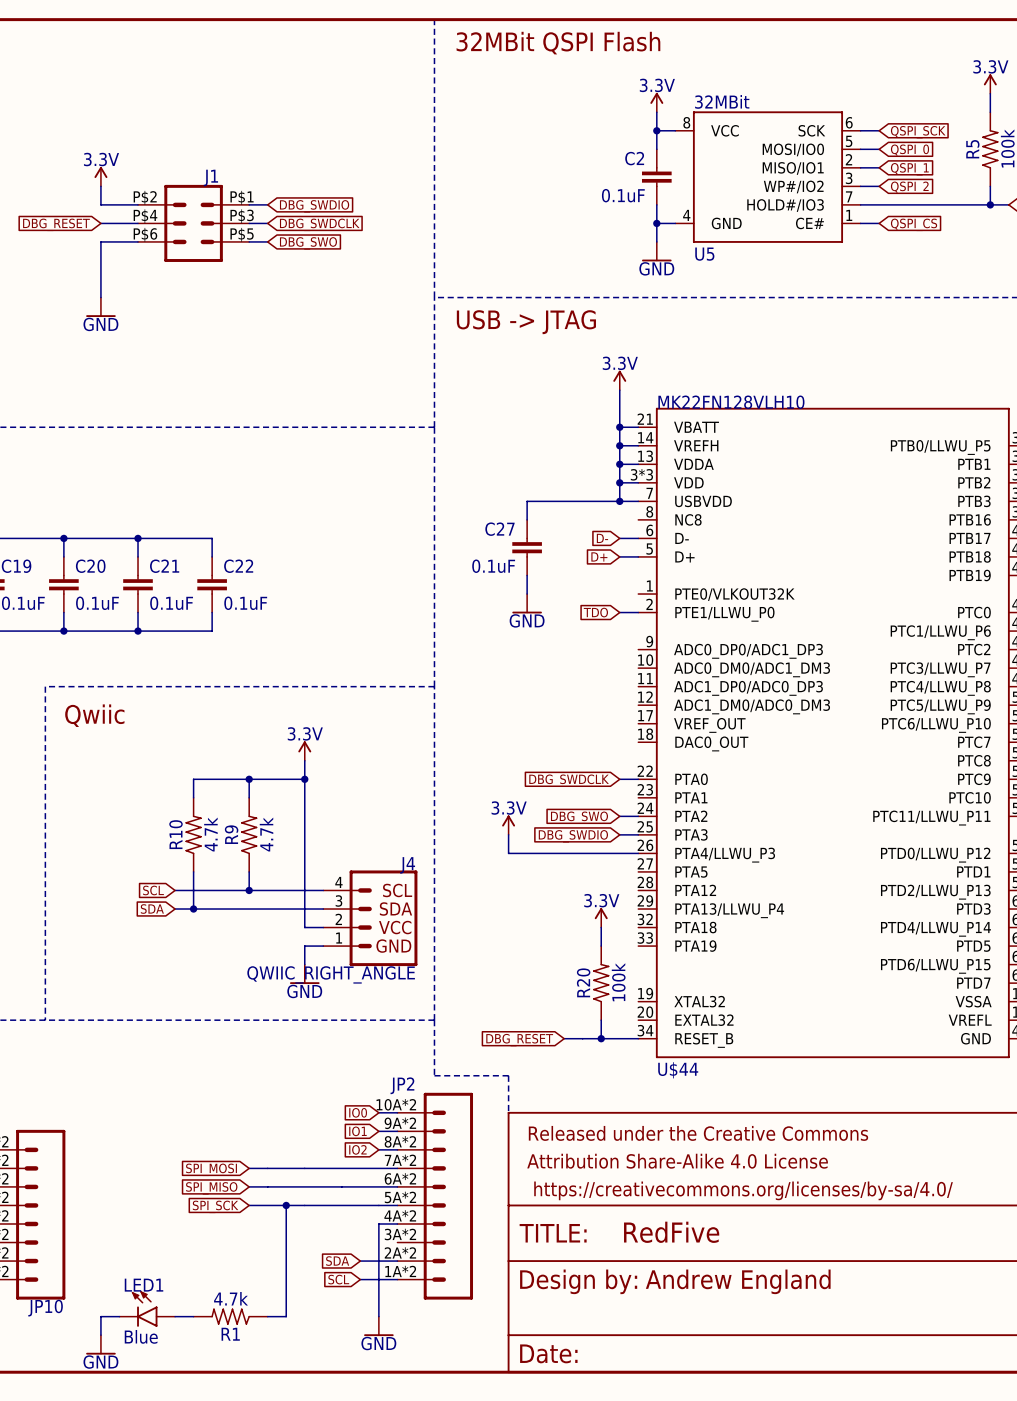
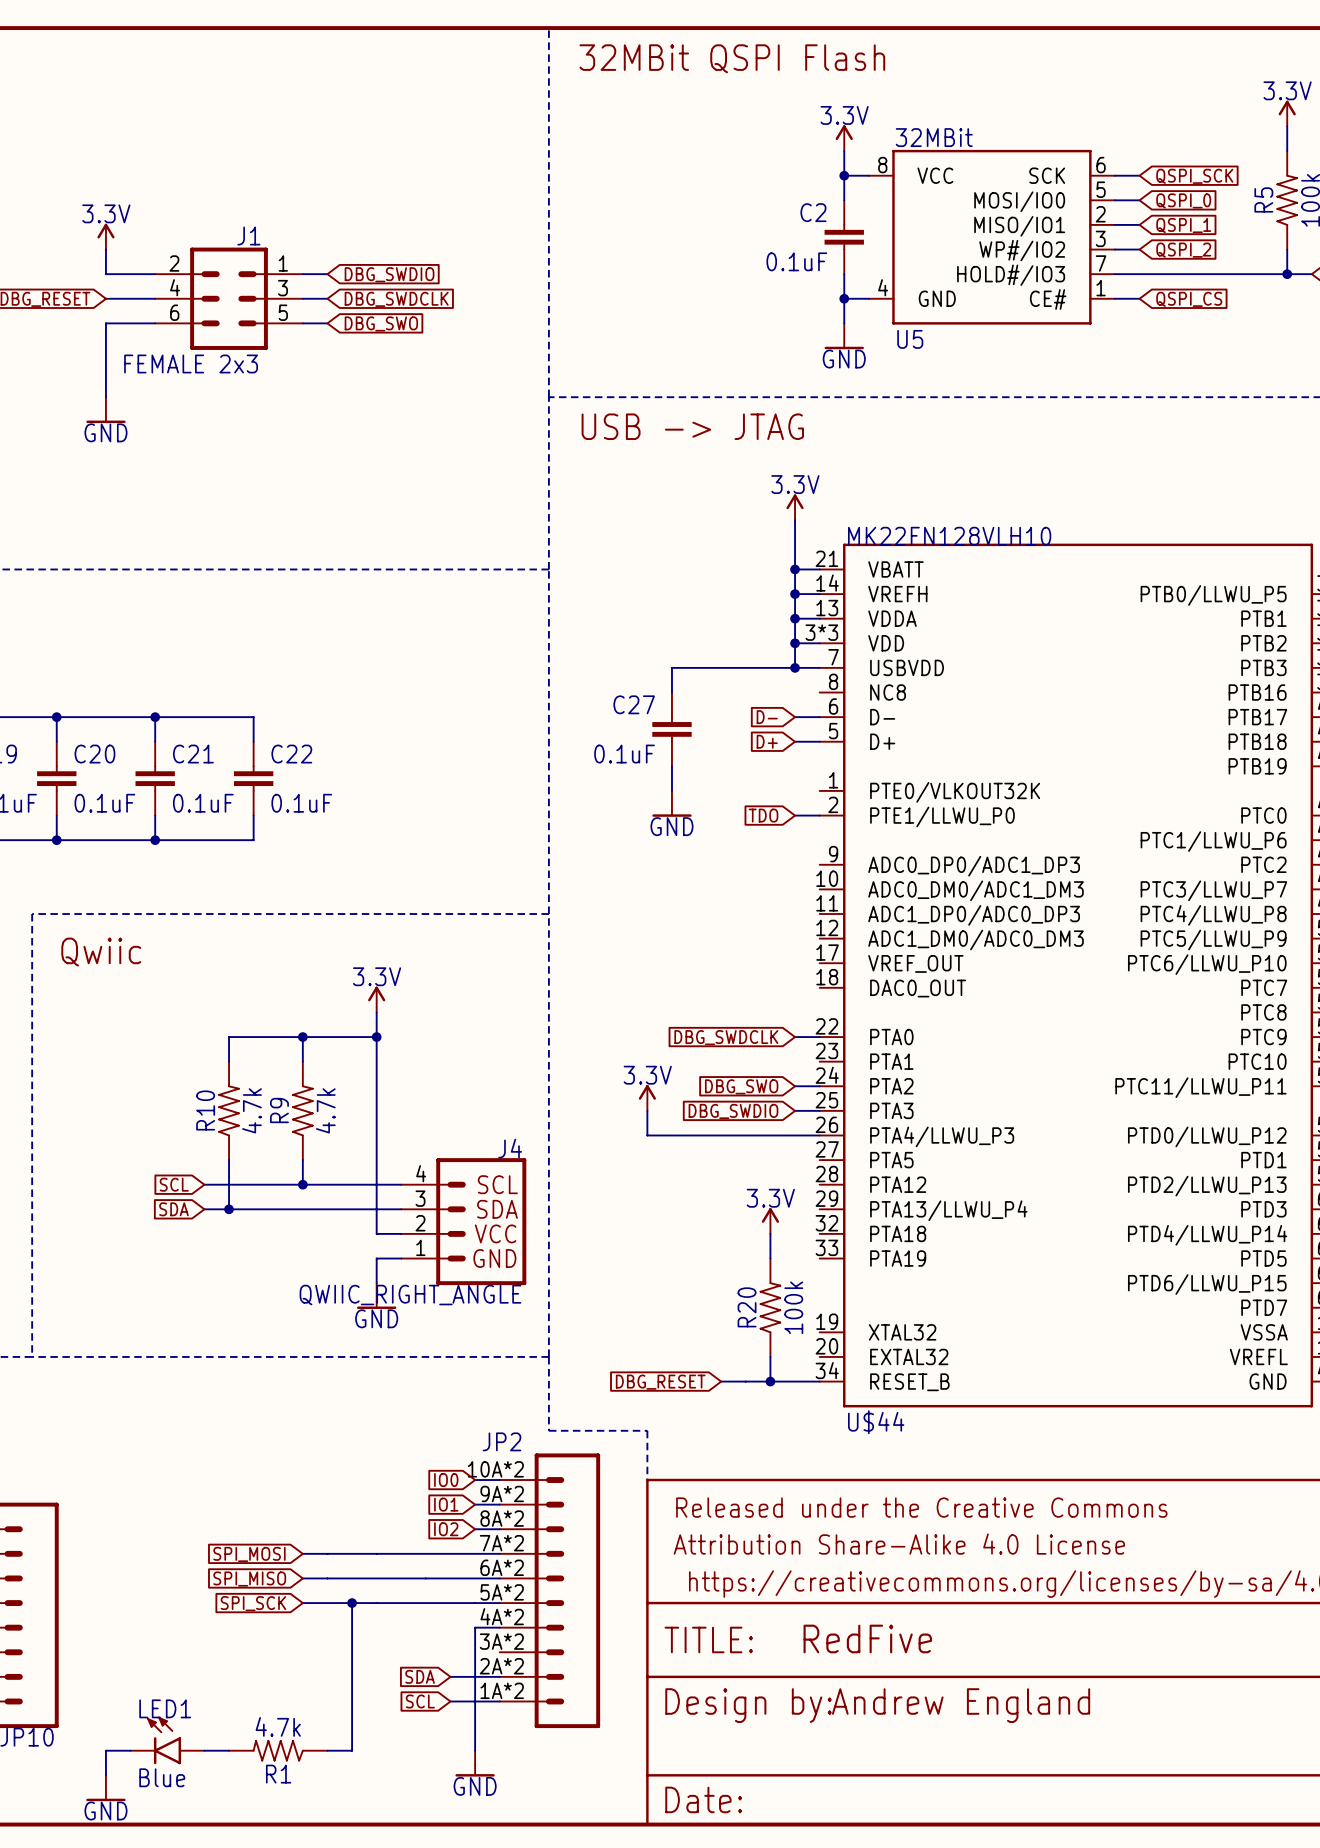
J1 pin number: P$2 (145, 197) -> 2 (174, 263)
J1 pin number: P$1 (242, 197) -> 1 (283, 263)
J1 pin number: P$4 (145, 216) -> 4 (175, 287)
J1 pin number: P$3 (242, 216) -> 3 (282, 288)
J1 pin number: P$6 (145, 234) -> 6 (174, 312)
J1 pin number: P$5 (242, 234) -> 5 (283, 312)
J1 value: none -> FEMALE 2x3 (191, 363)

